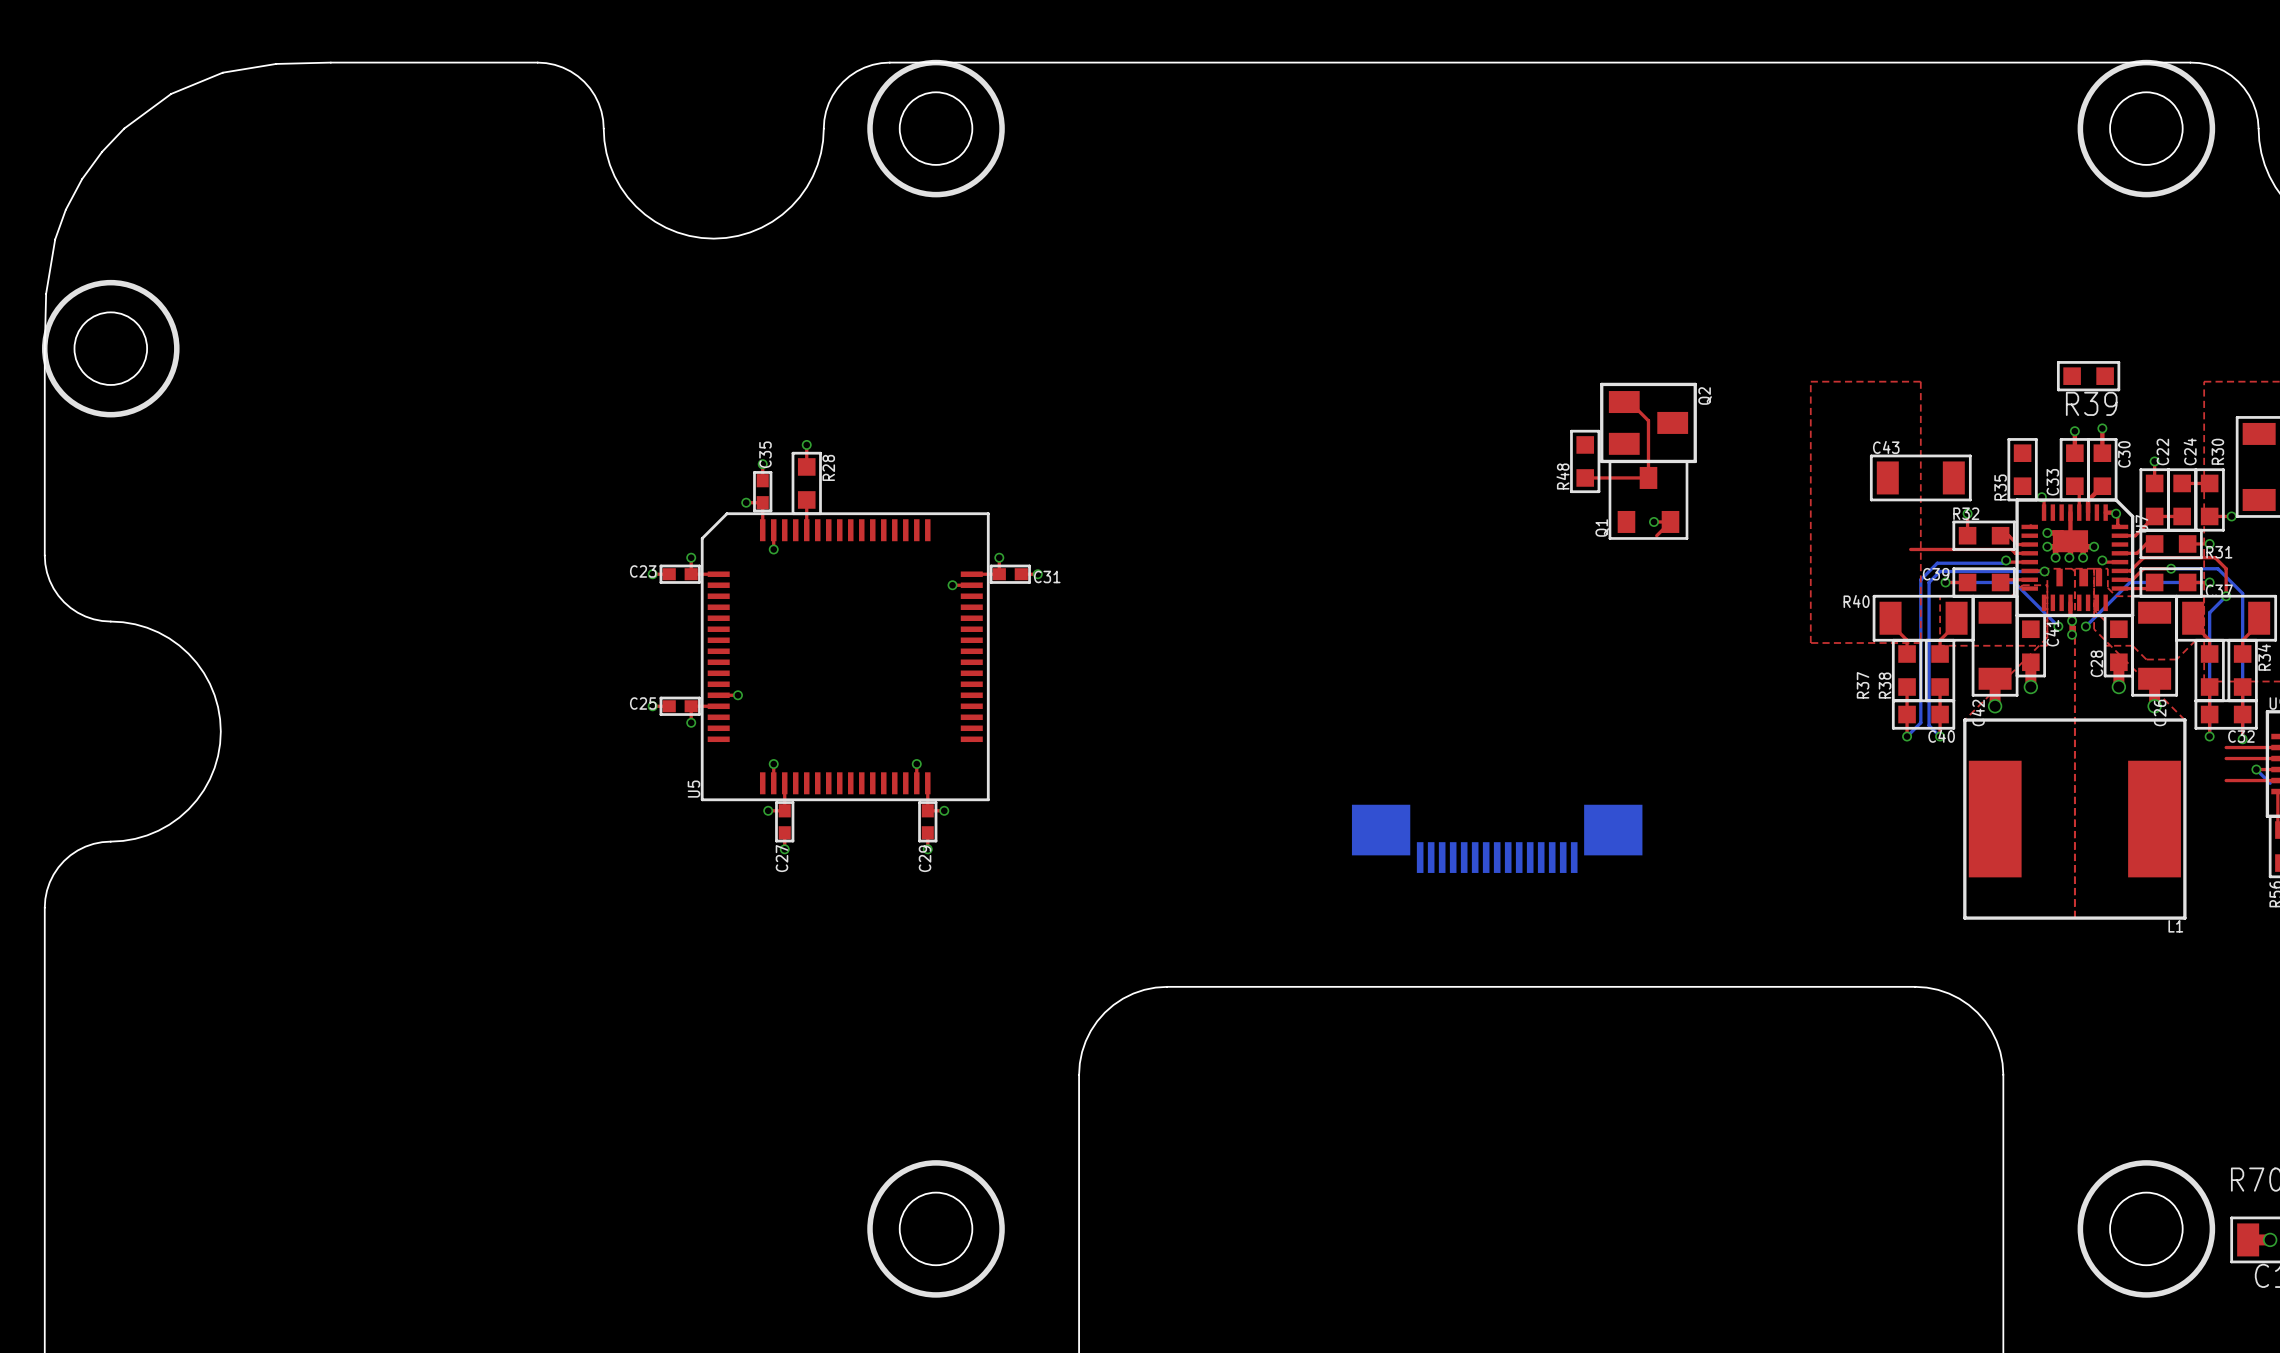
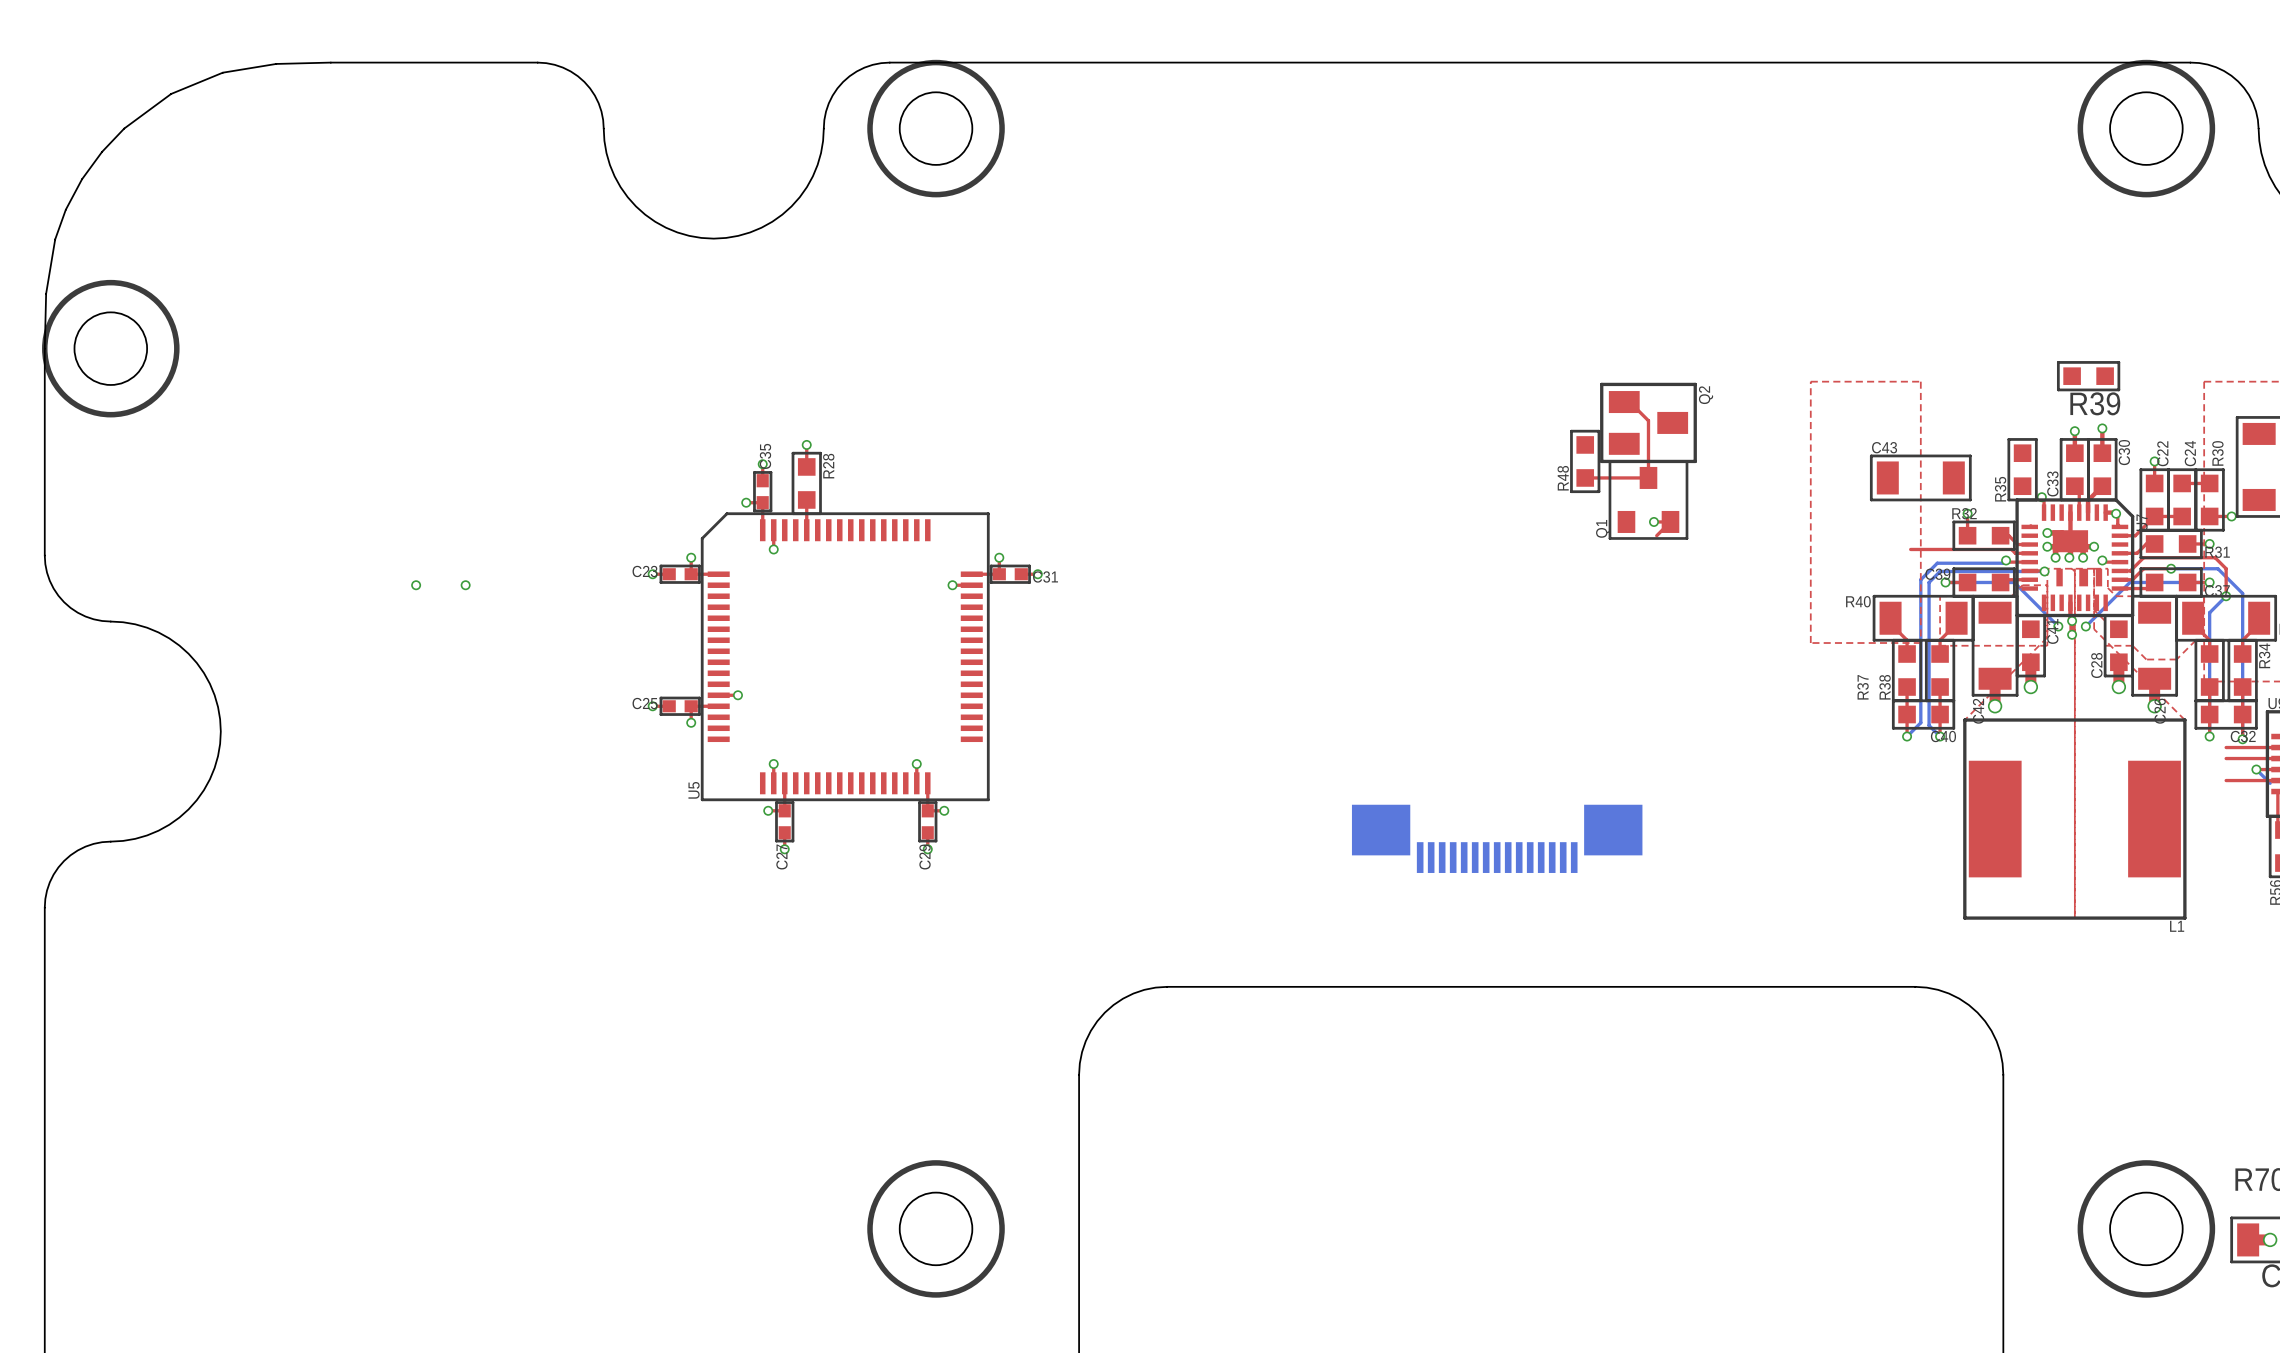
via: none -> (416, 585)
via: none -> (465, 585)

